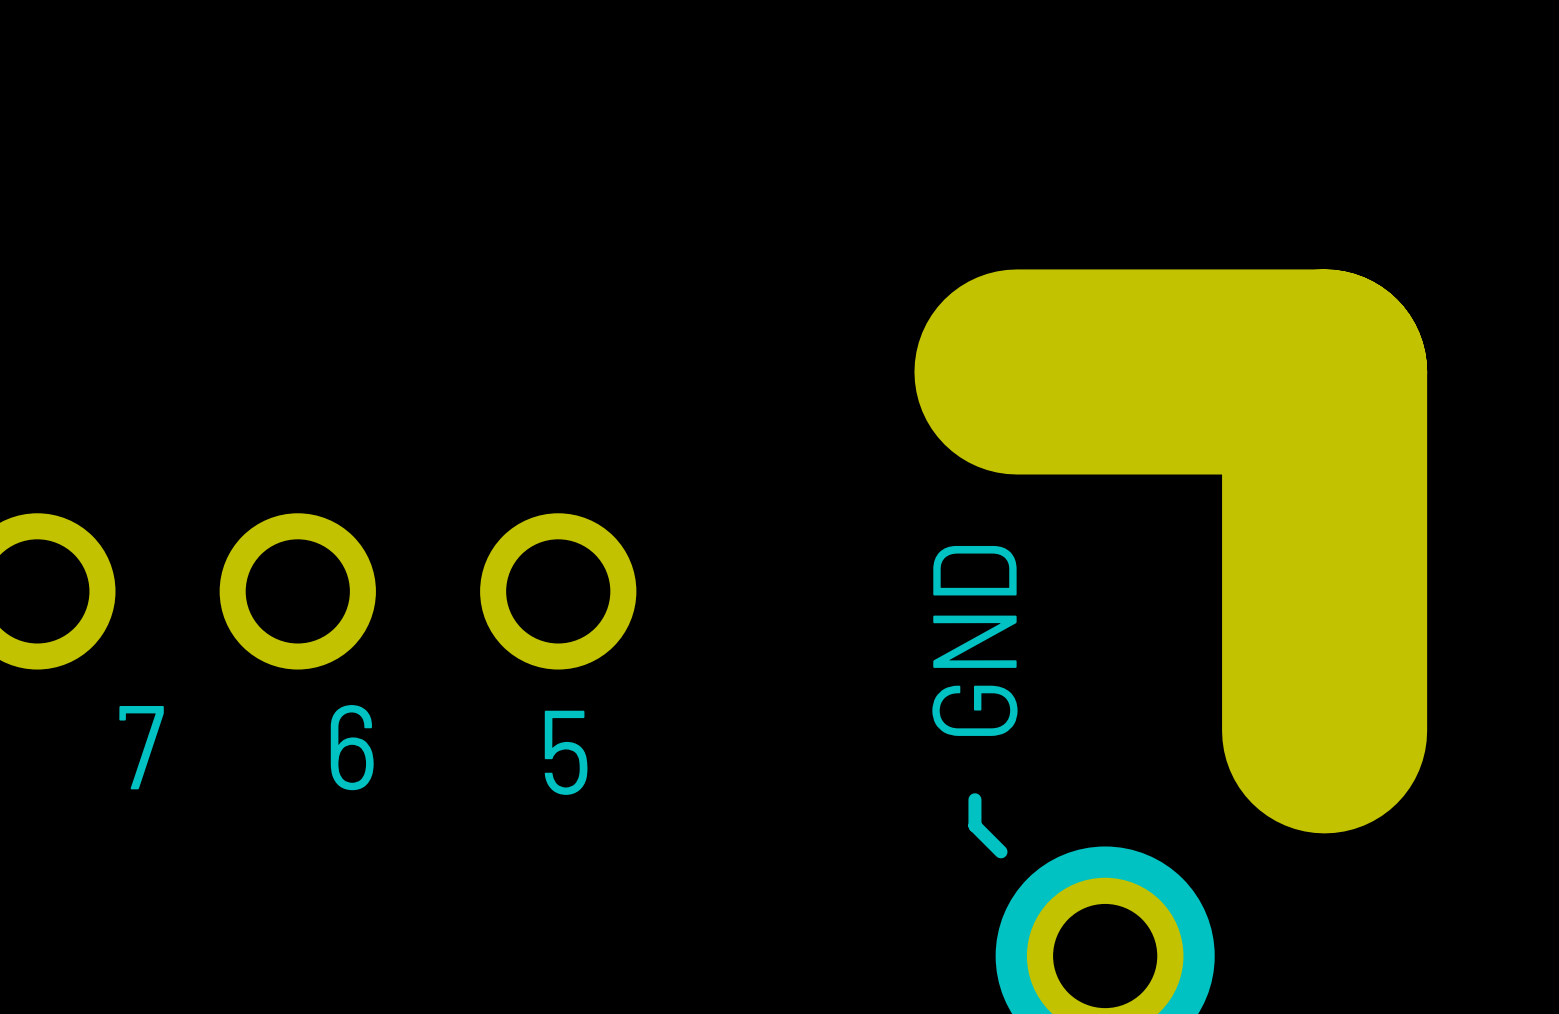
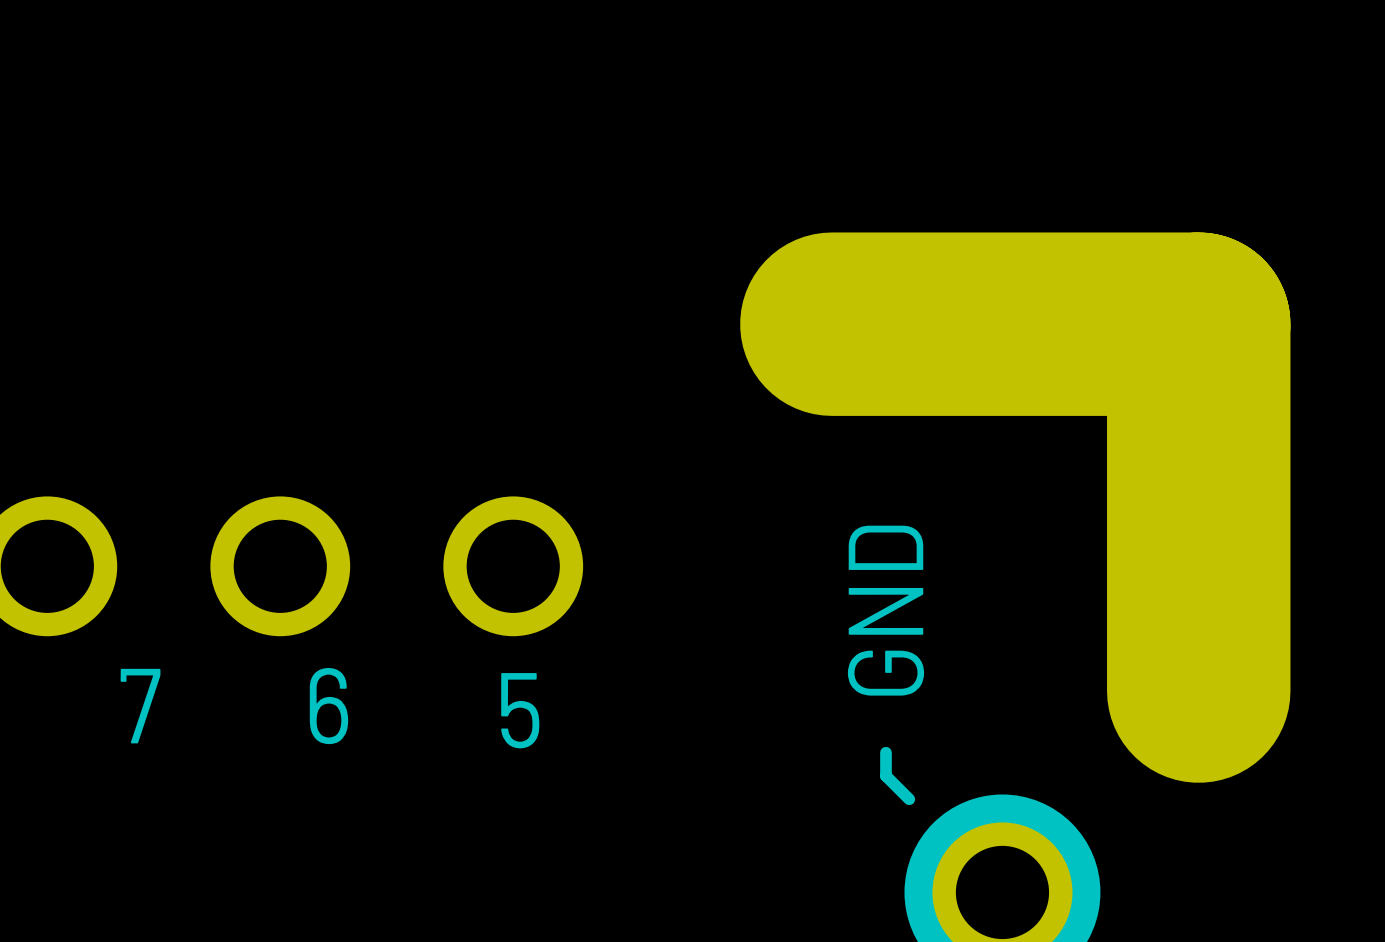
board edge: (1016, 371) (1324, 371) -> (831, 324) (1198, 324) (1198, 370)

